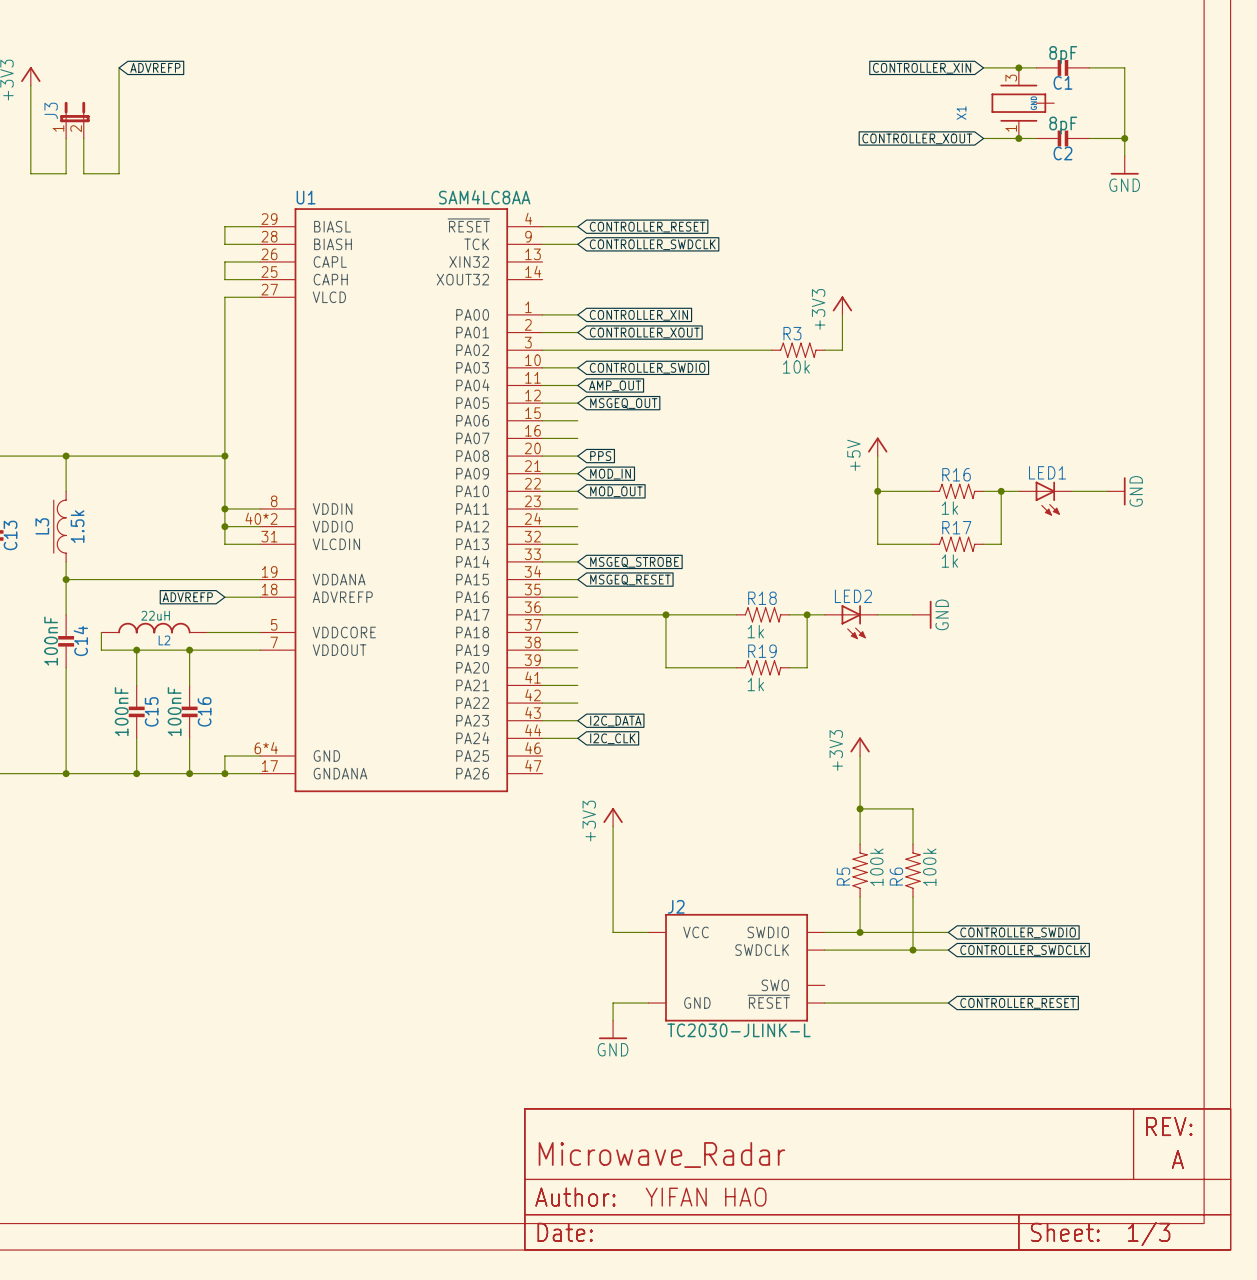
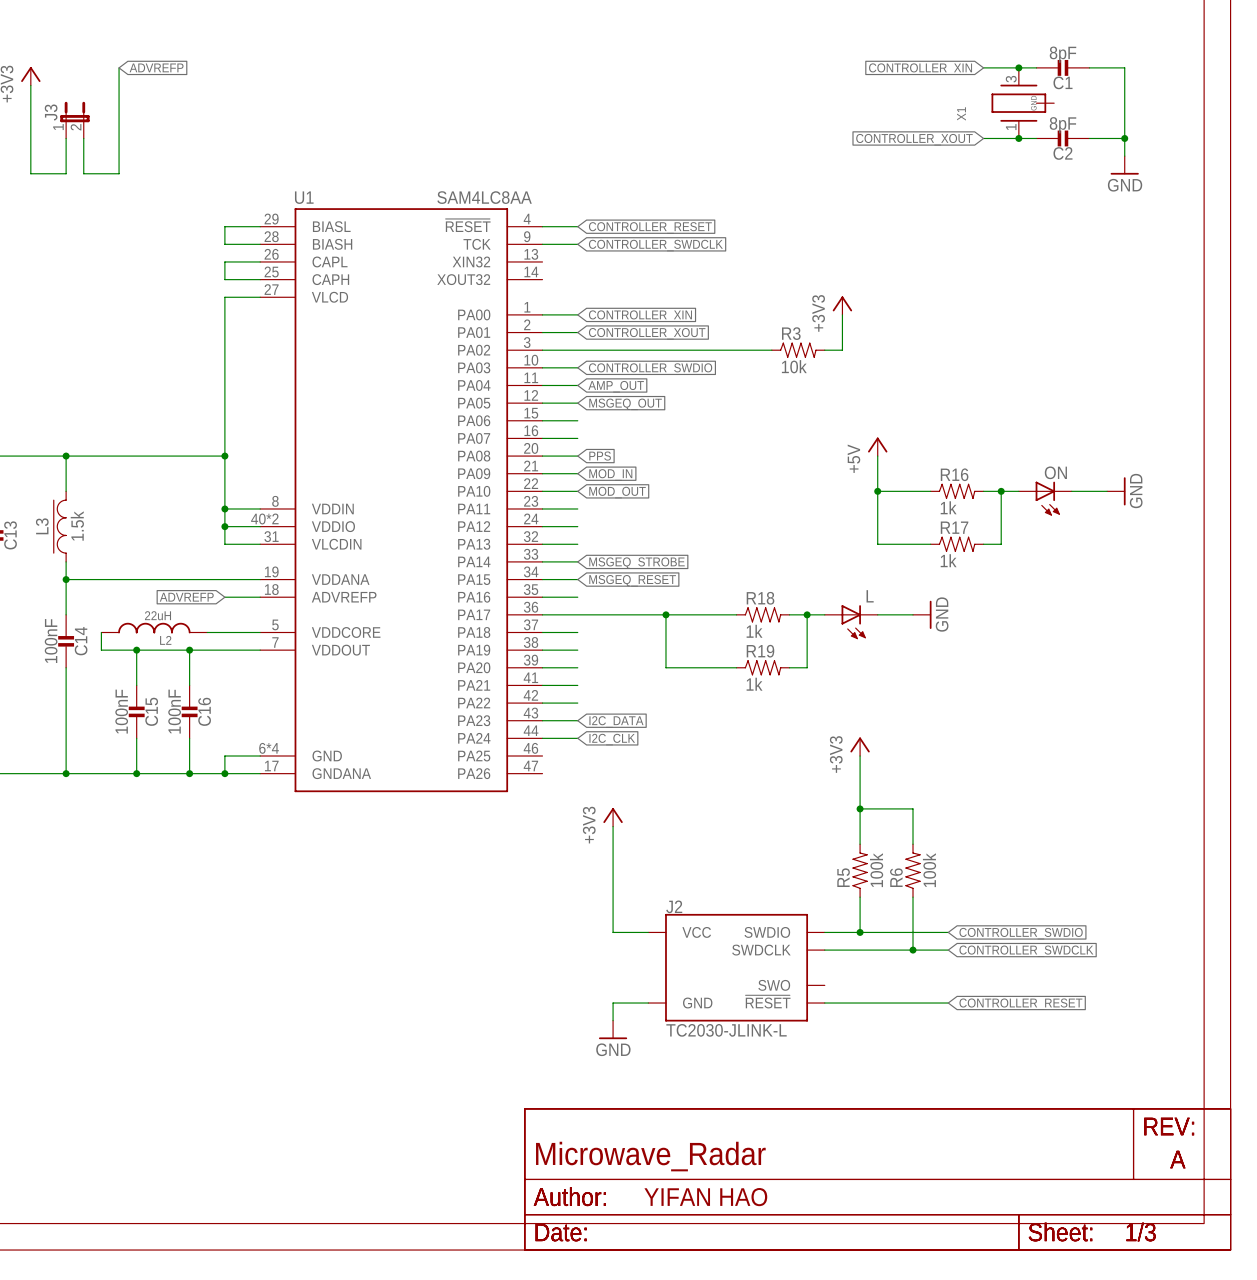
LED1 name: LED1 (1047, 472) -> ON (1055, 472)
LED2 name: LED2 (853, 596) -> L (870, 596)

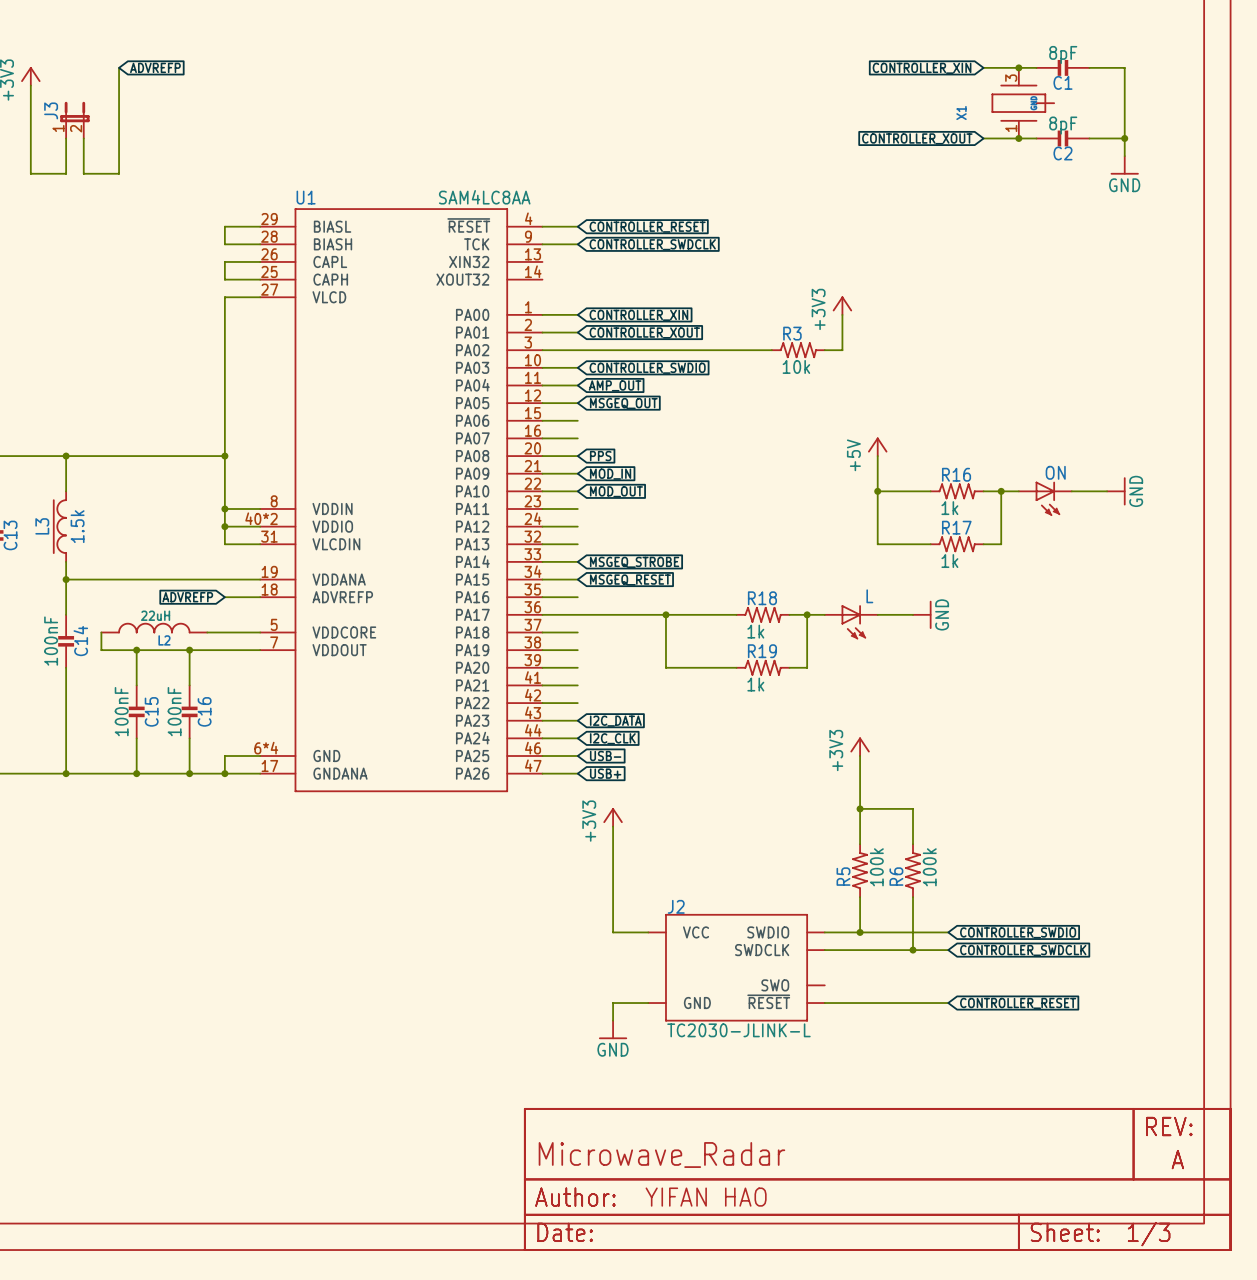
wire: none -> (542, 756) (577, 756)
global label: none -> USB- (605, 756)
wire: none -> (542, 773) (577, 773)
global label: none -> USB+ (605, 773)

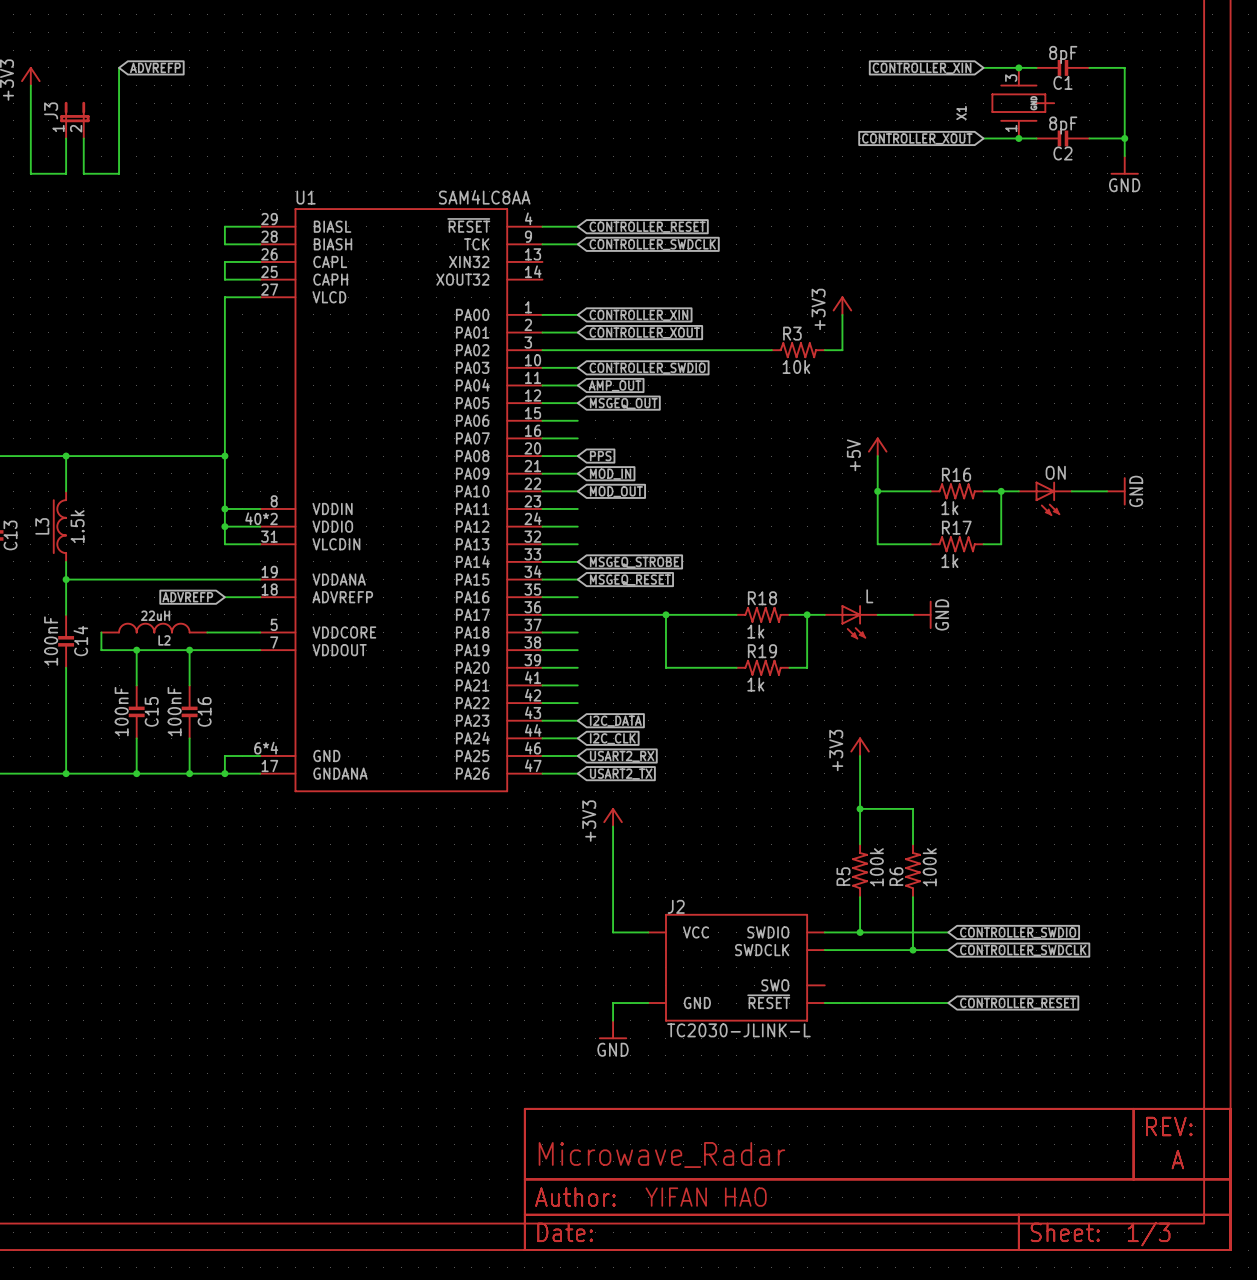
global label: USB- (605, 756) -> USART2_RX (622, 756)
global label: USB+ (605, 773) -> USART2_TX (621, 774)

